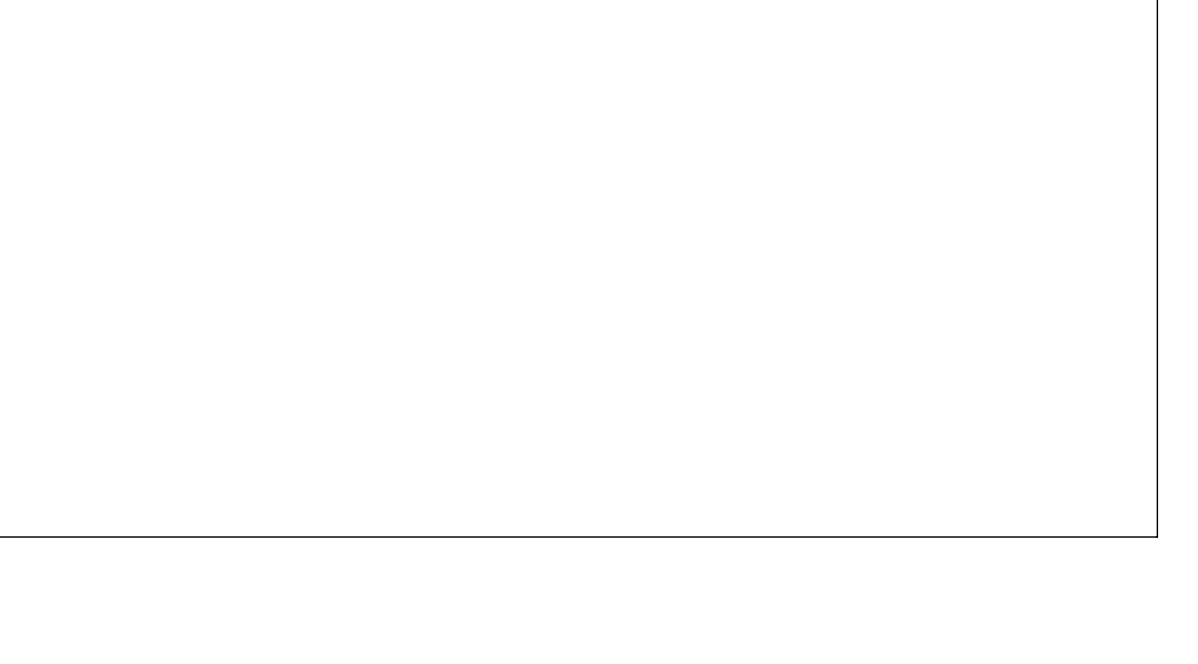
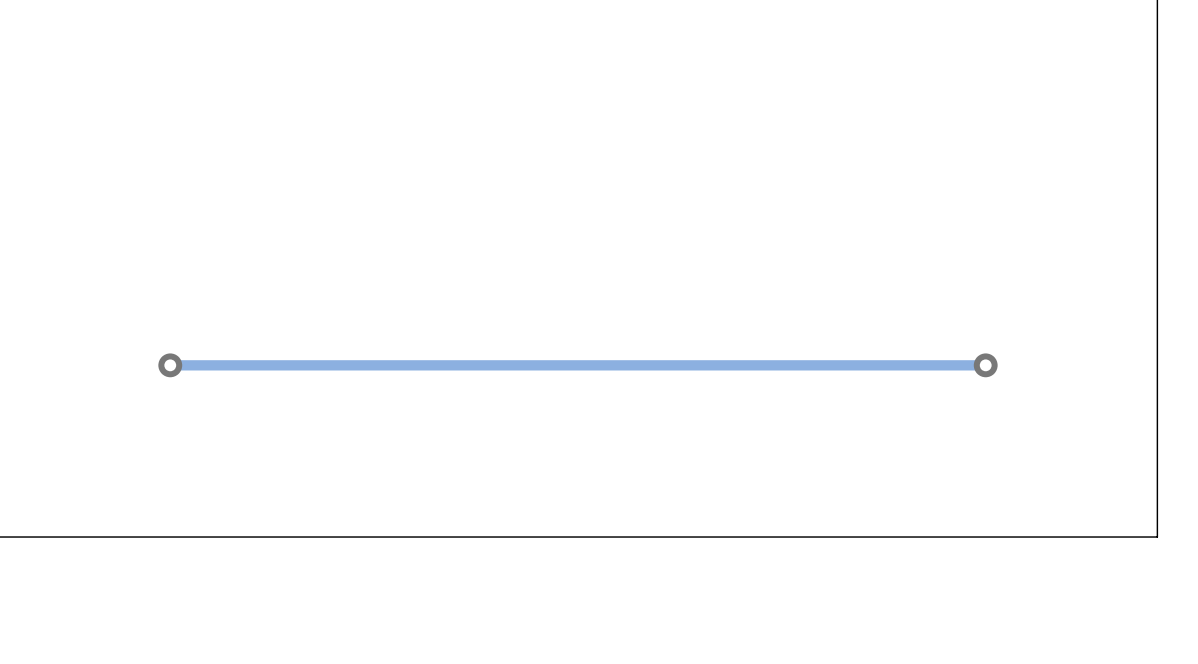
via: none -> (170, 365)
track: none -> (985, 365) (170, 365)
via: none -> (985, 365)

